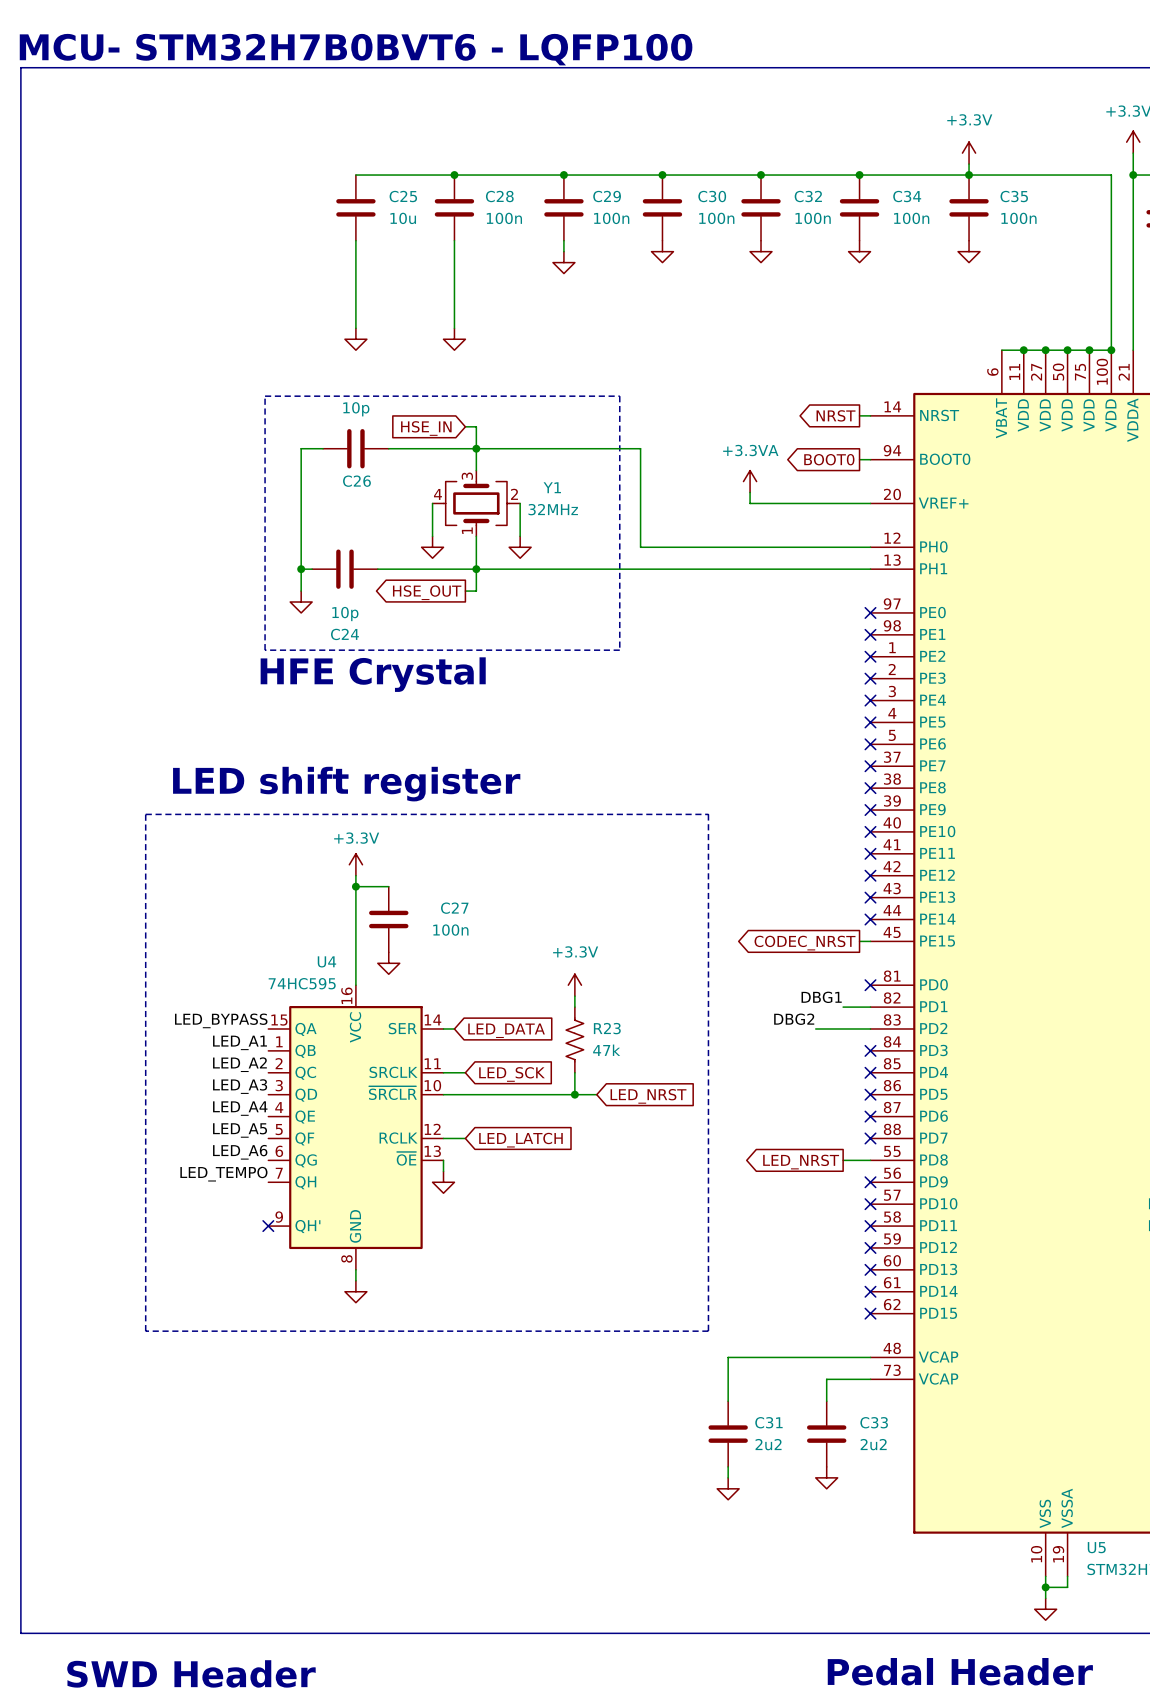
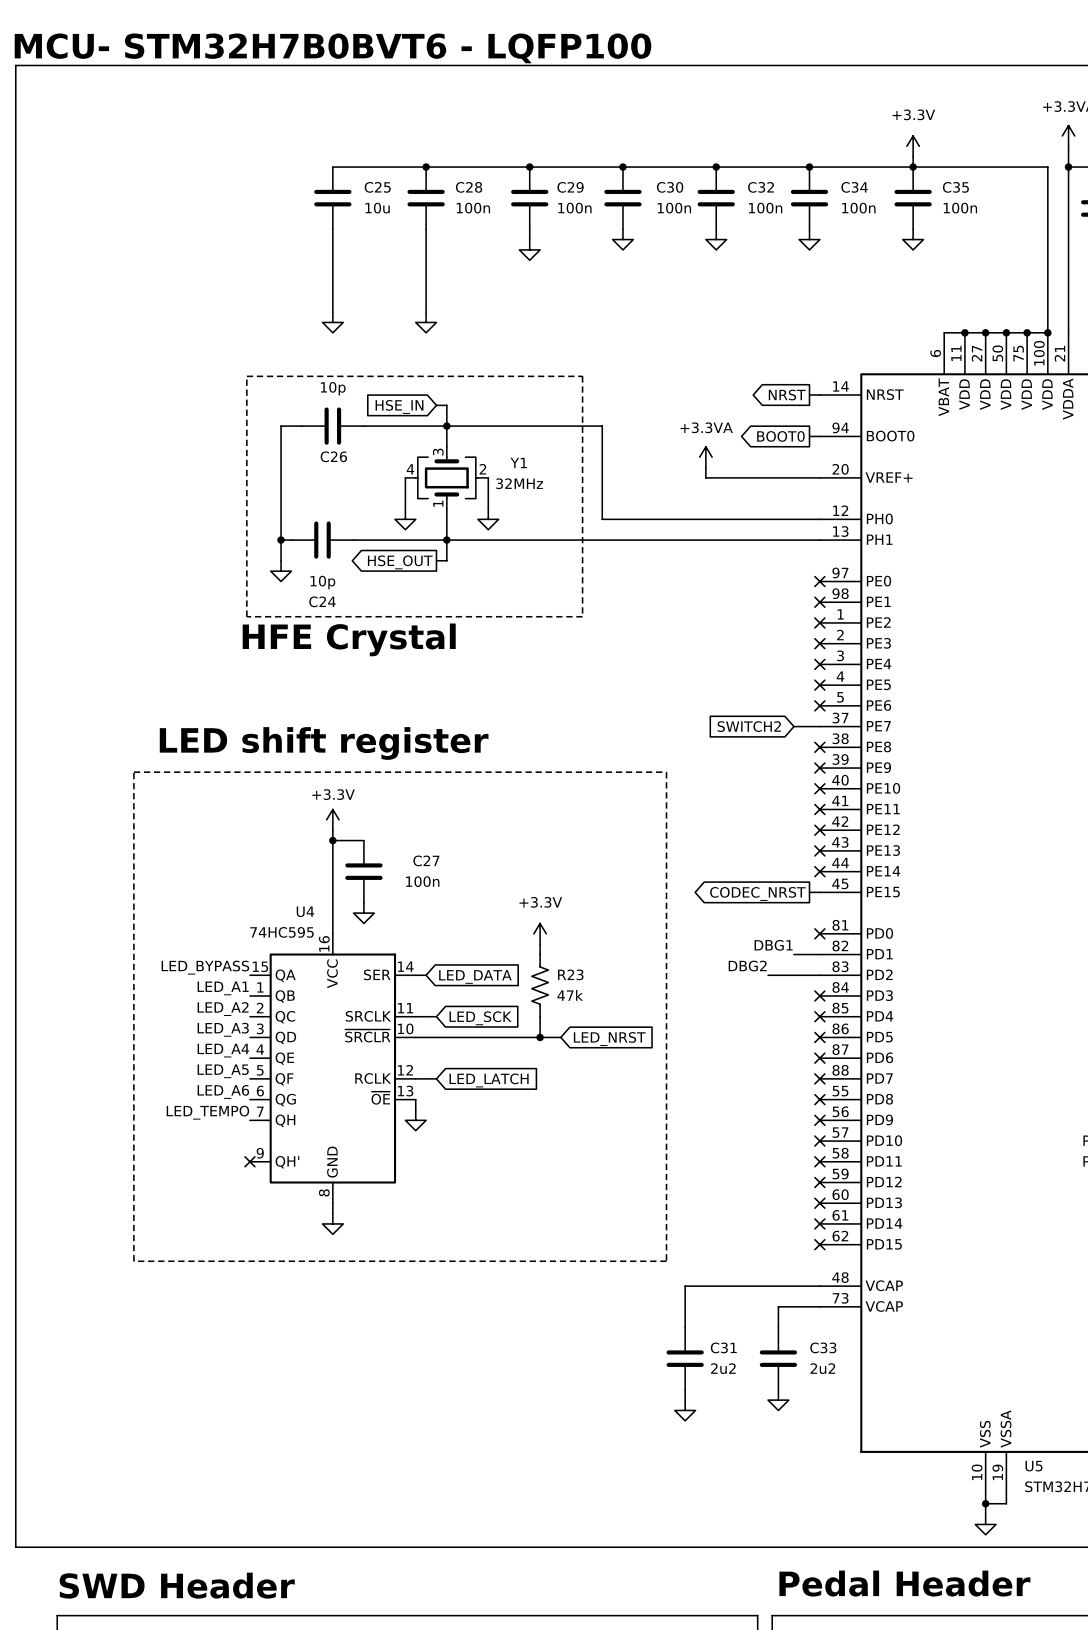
global label: none -> SWITCH2 (749, 726)
wire: none -> (793, 726) (819, 726)
no-connect mark: (870, 766) -> none
wire: (843, 1160) (870, 1160) -> none
no-connect mark: none -> (819, 1099)
global label: LED_NRST (801, 1162) -> none

